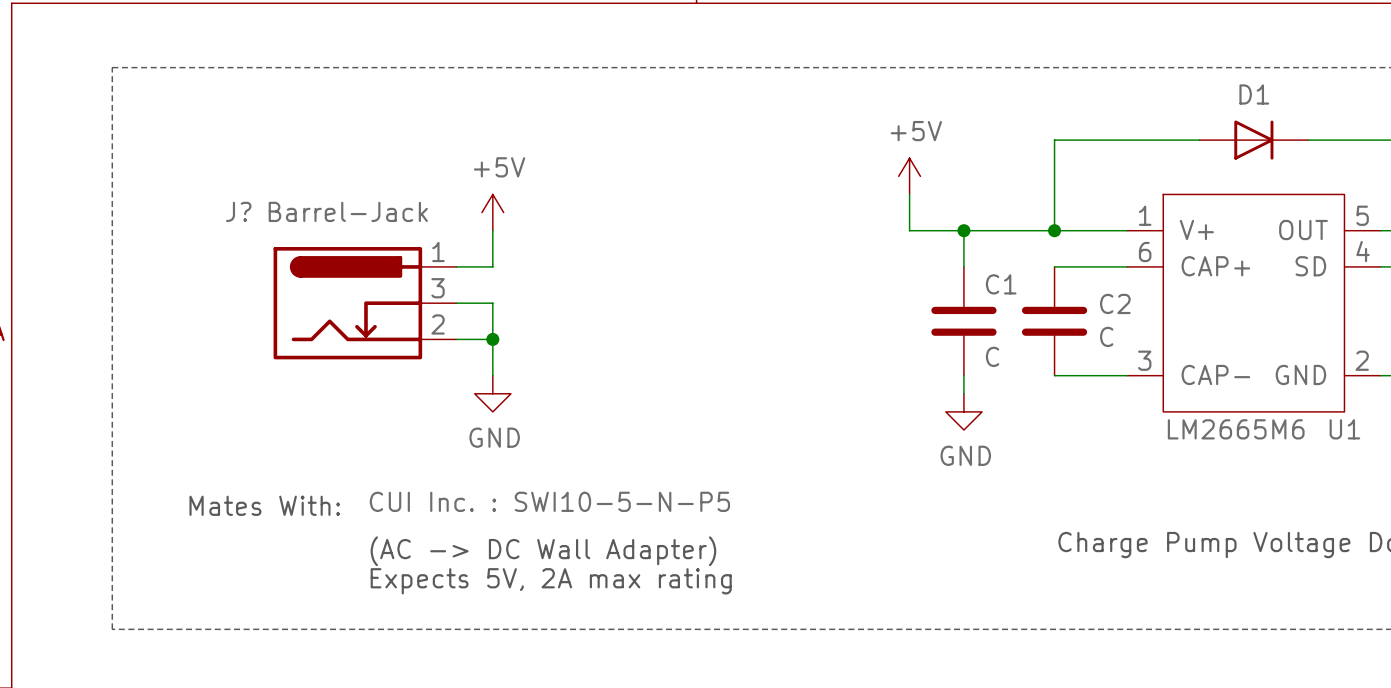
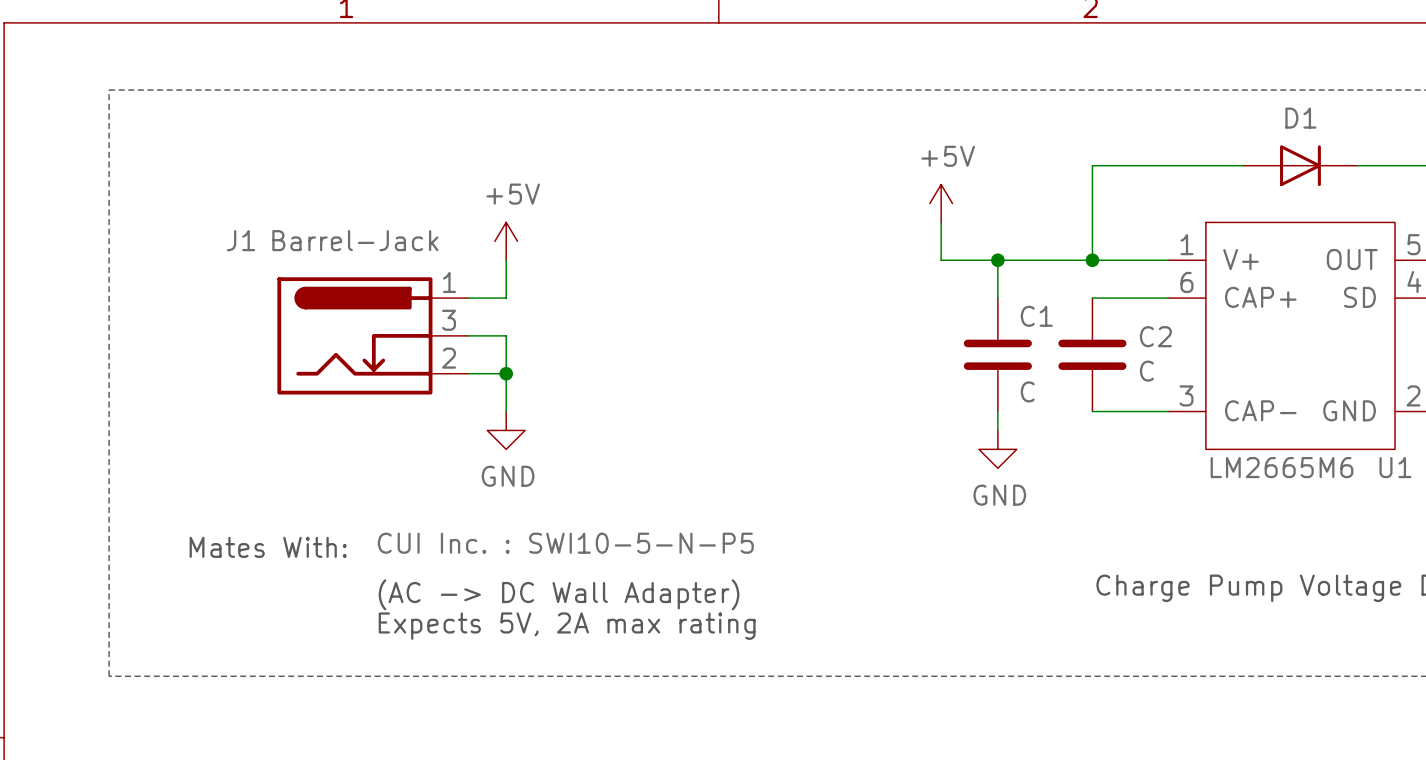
J? name: J? (238, 211) -> J1 (241, 240)

